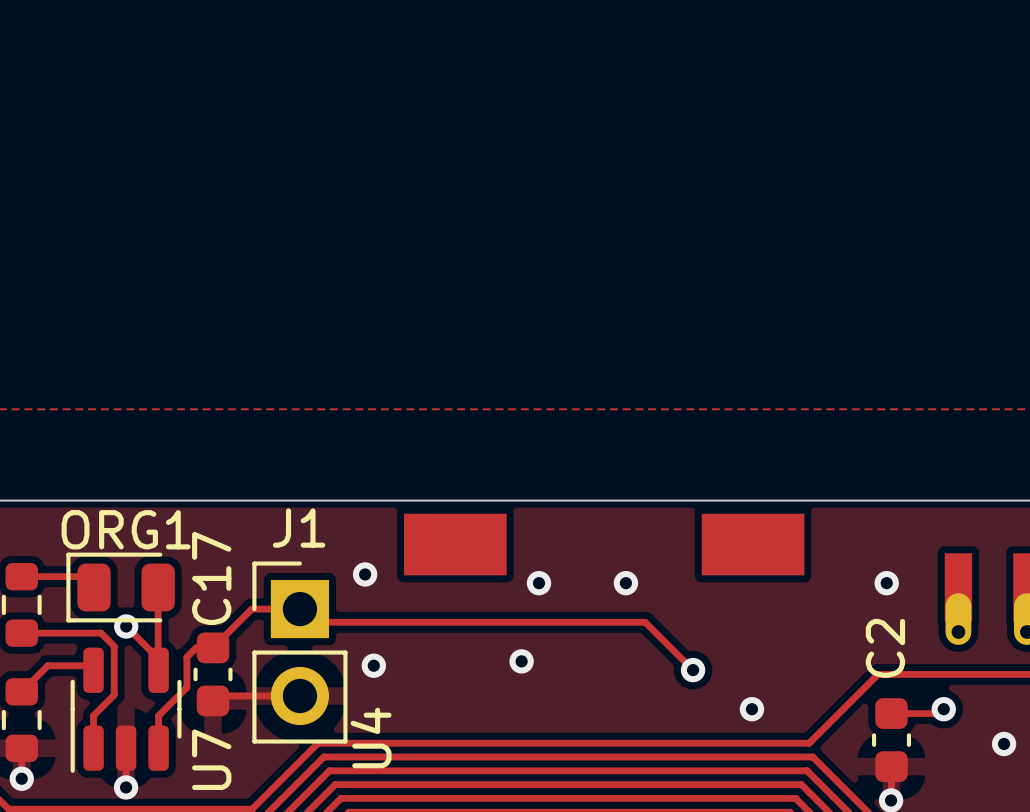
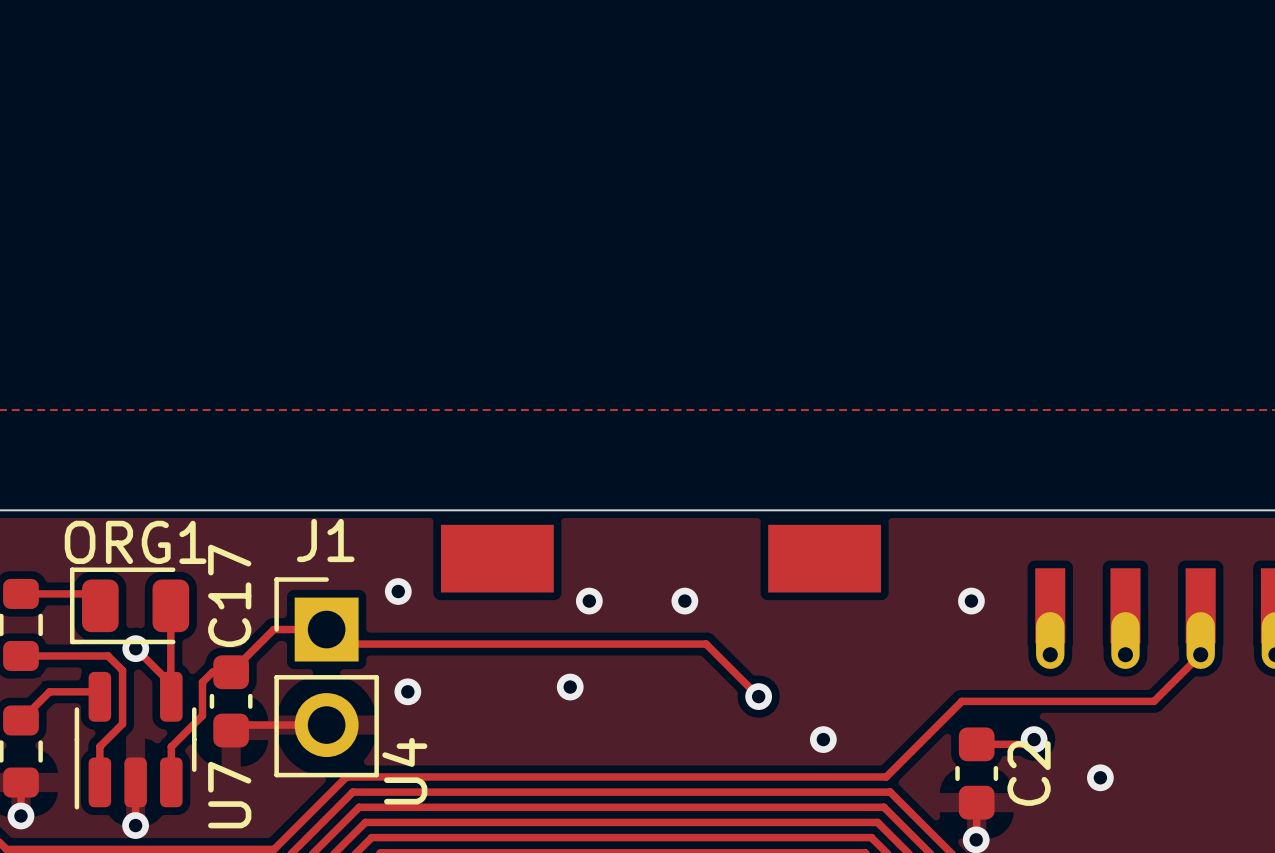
C2 name position: C2 (885, 648) -> C2 (1029, 773)

